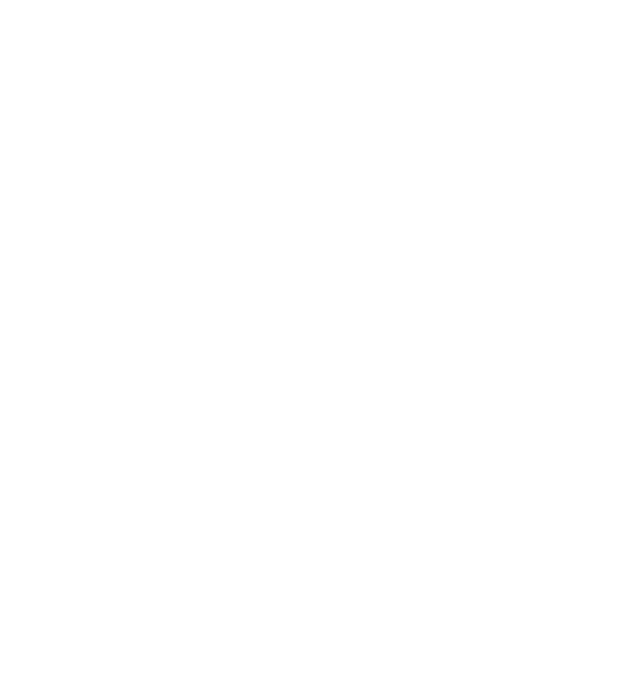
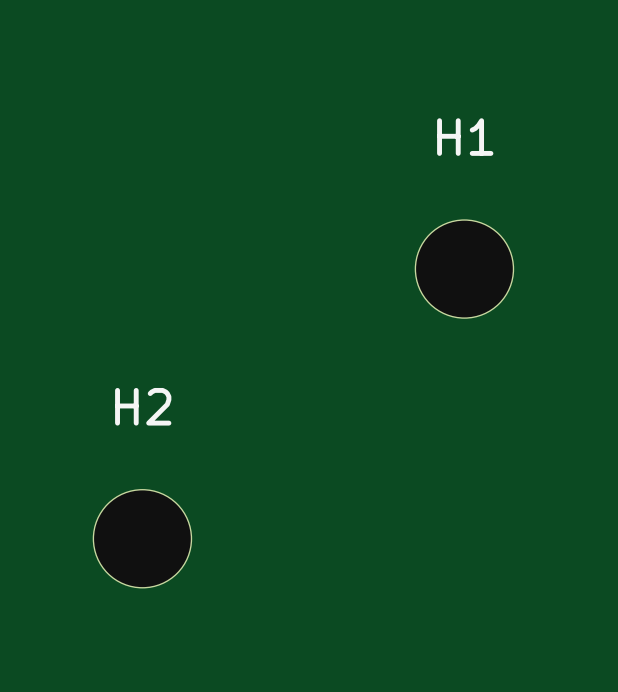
H1: none -> (464, 269)
H2: none -> (142, 538)

